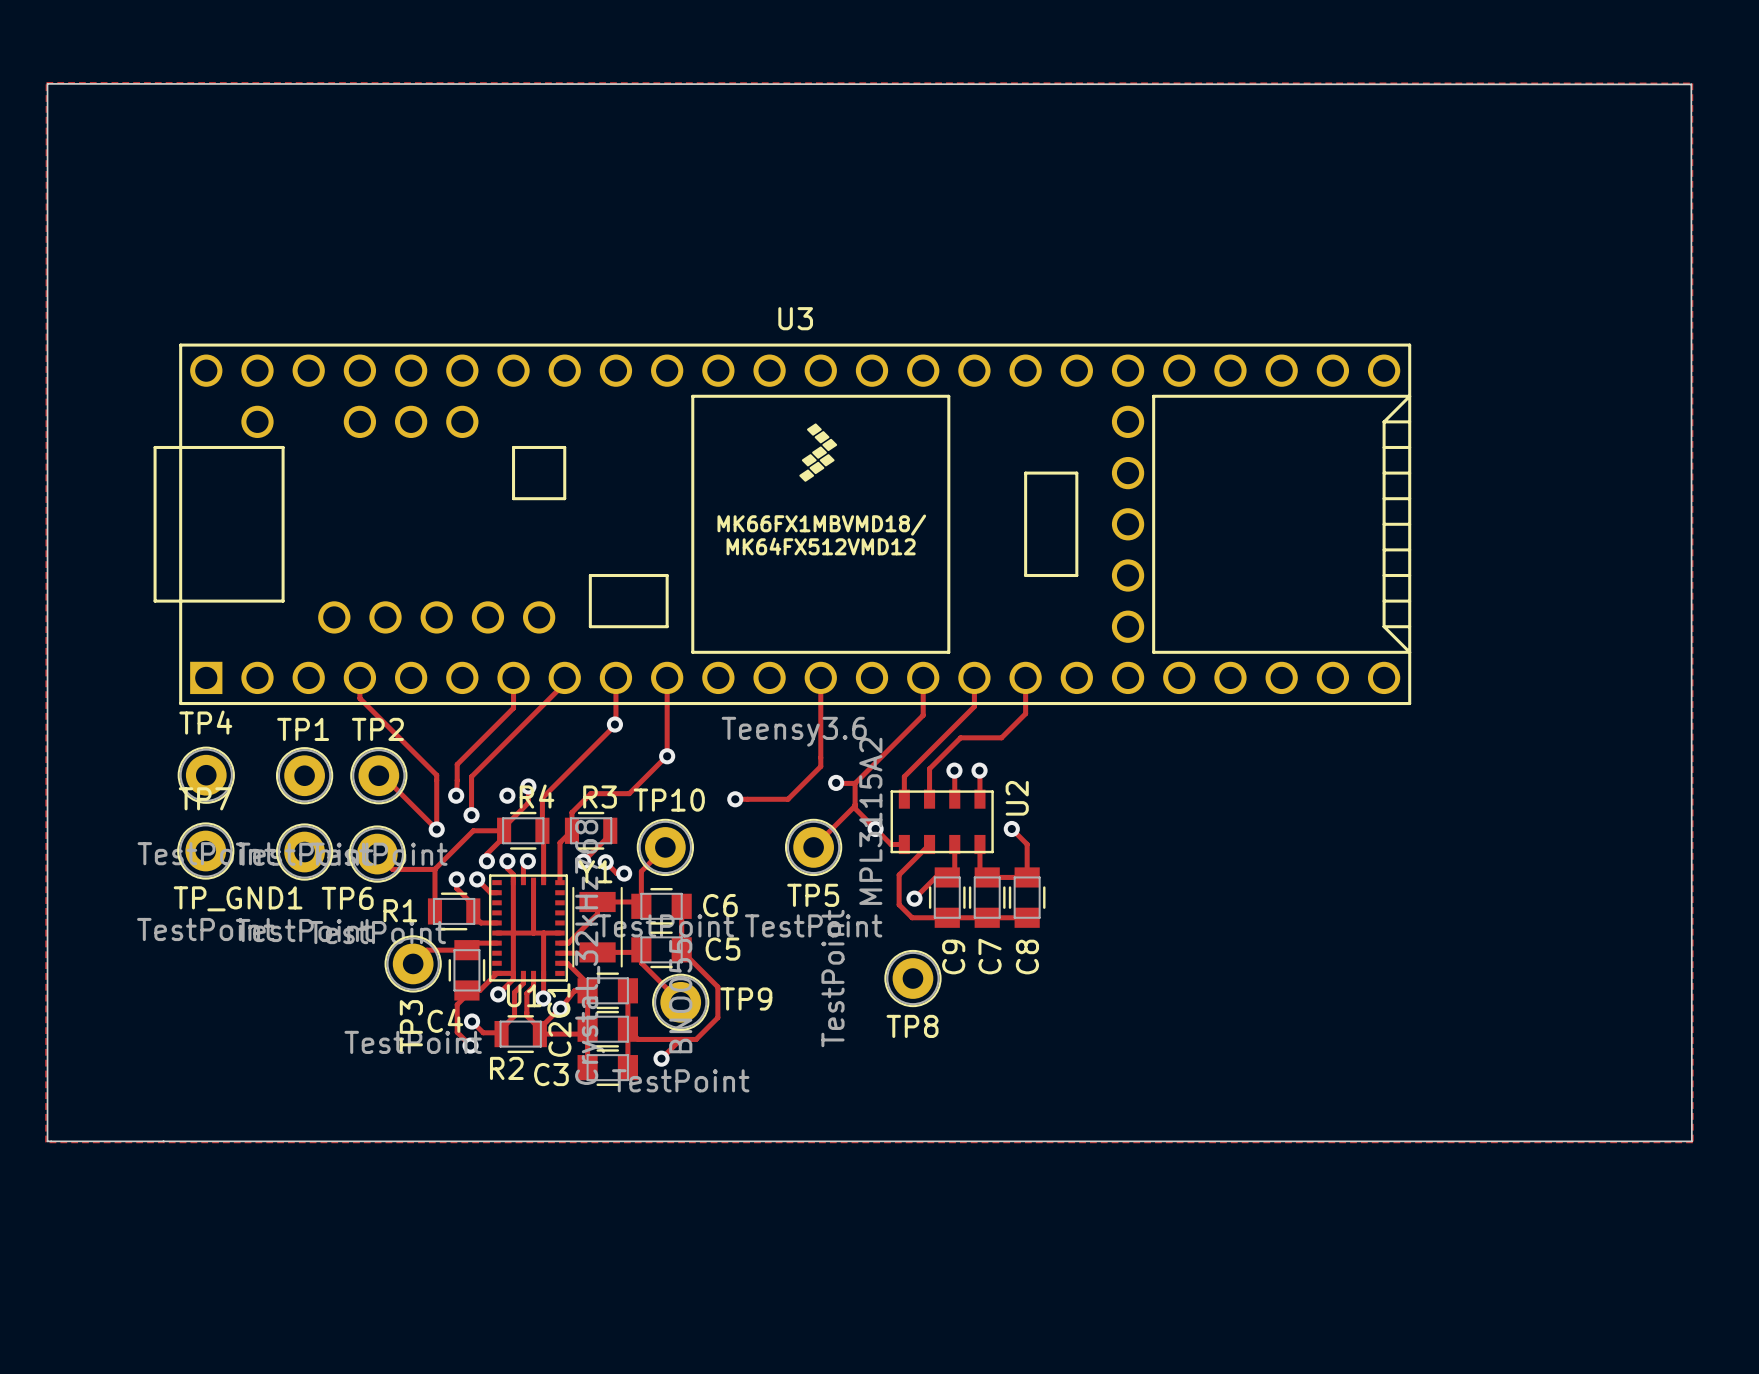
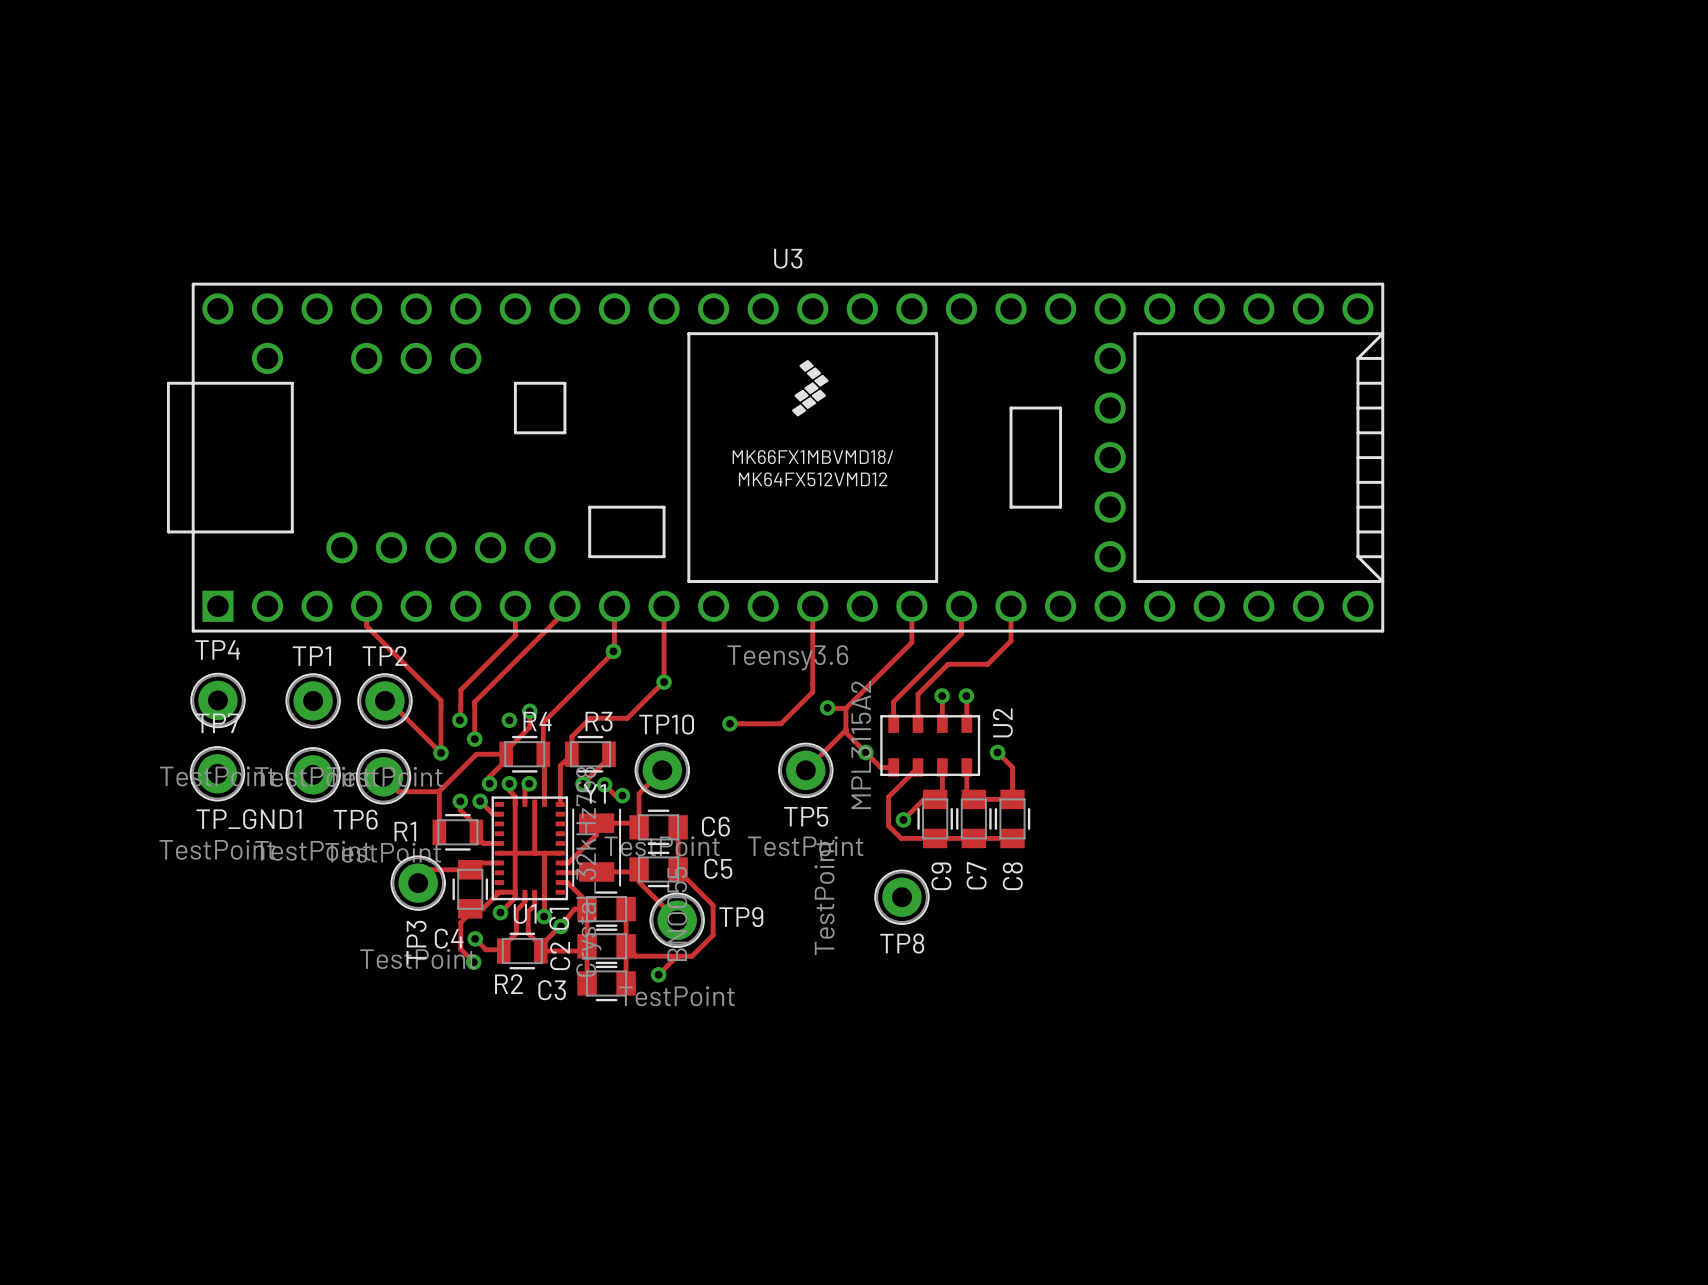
zone outline: (46, 82) (1692, 83) (1692, 1142) (45, 1142) (46, 82) -> none
board edge: (47, 83) (47, 1141) (1691, 1141) (1691, 84) (47, 83) -> none

